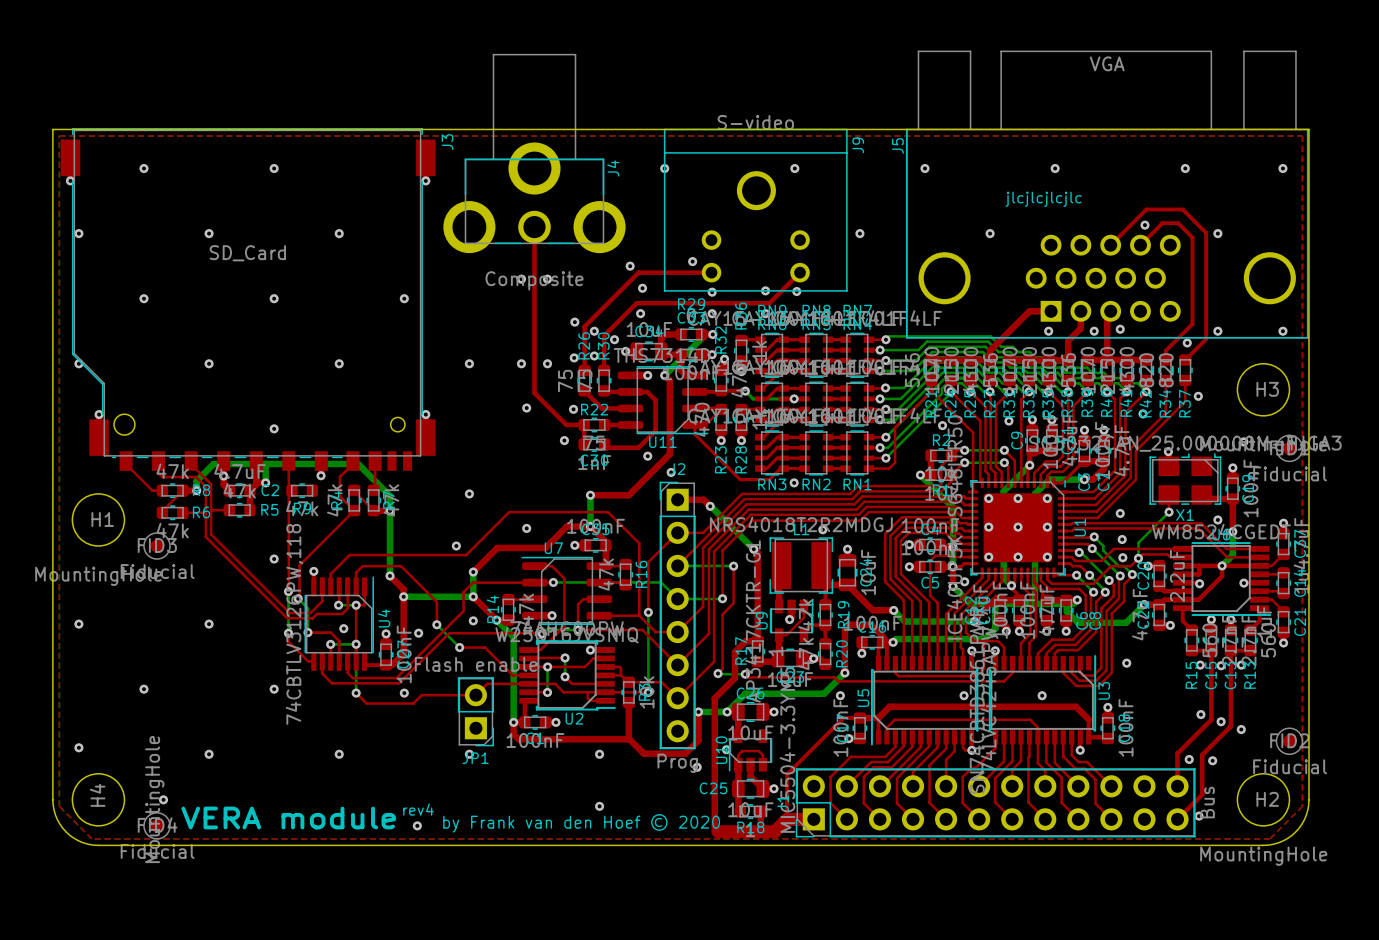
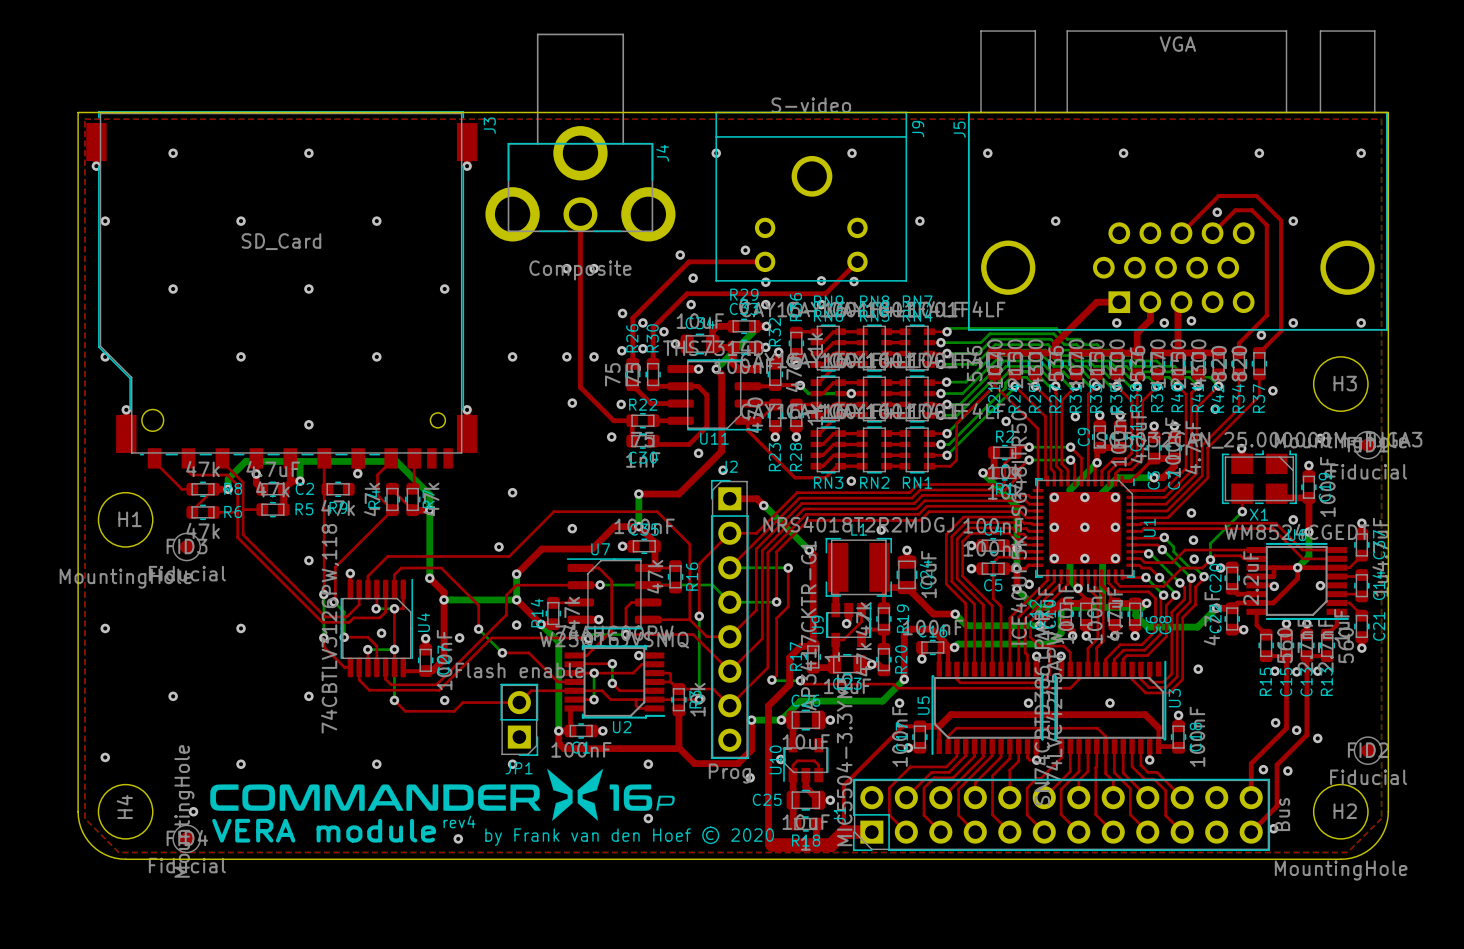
text: jlcjlcjlcjlc (1043, 199) -> none
drawing: none -> [210, 768, 675, 821]

